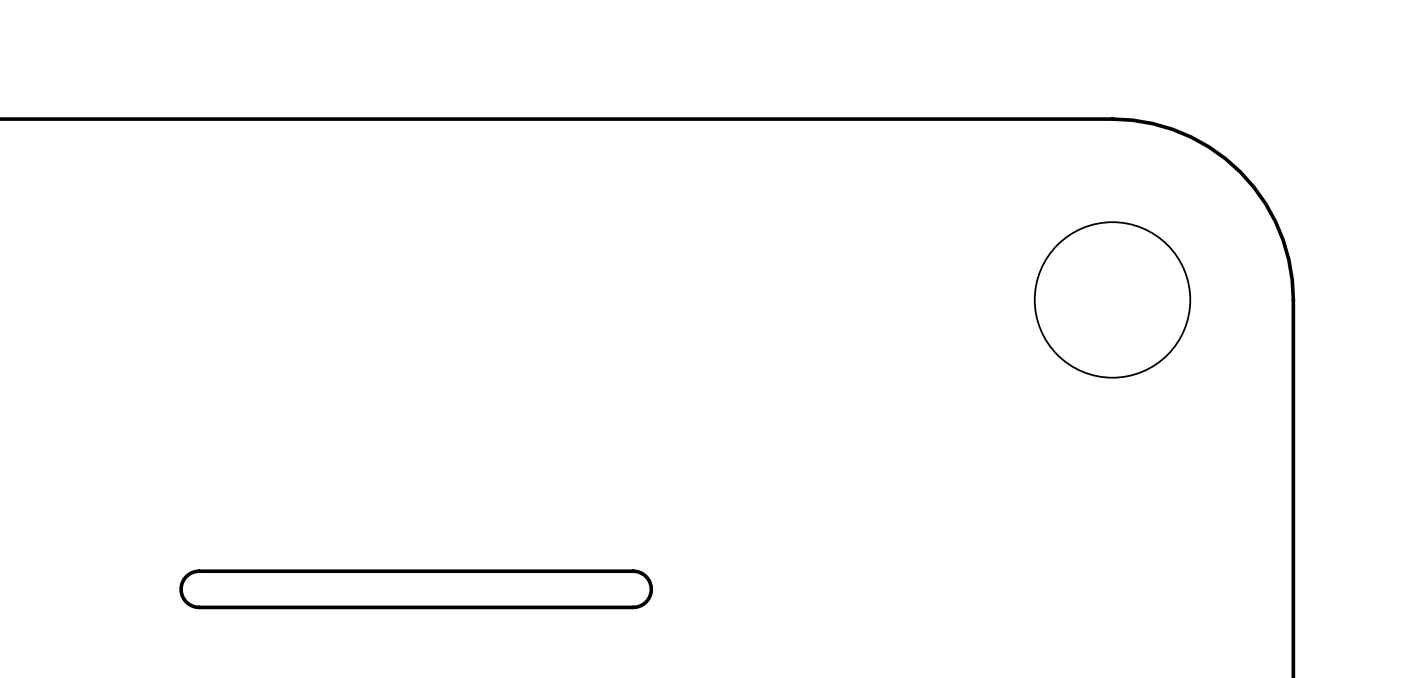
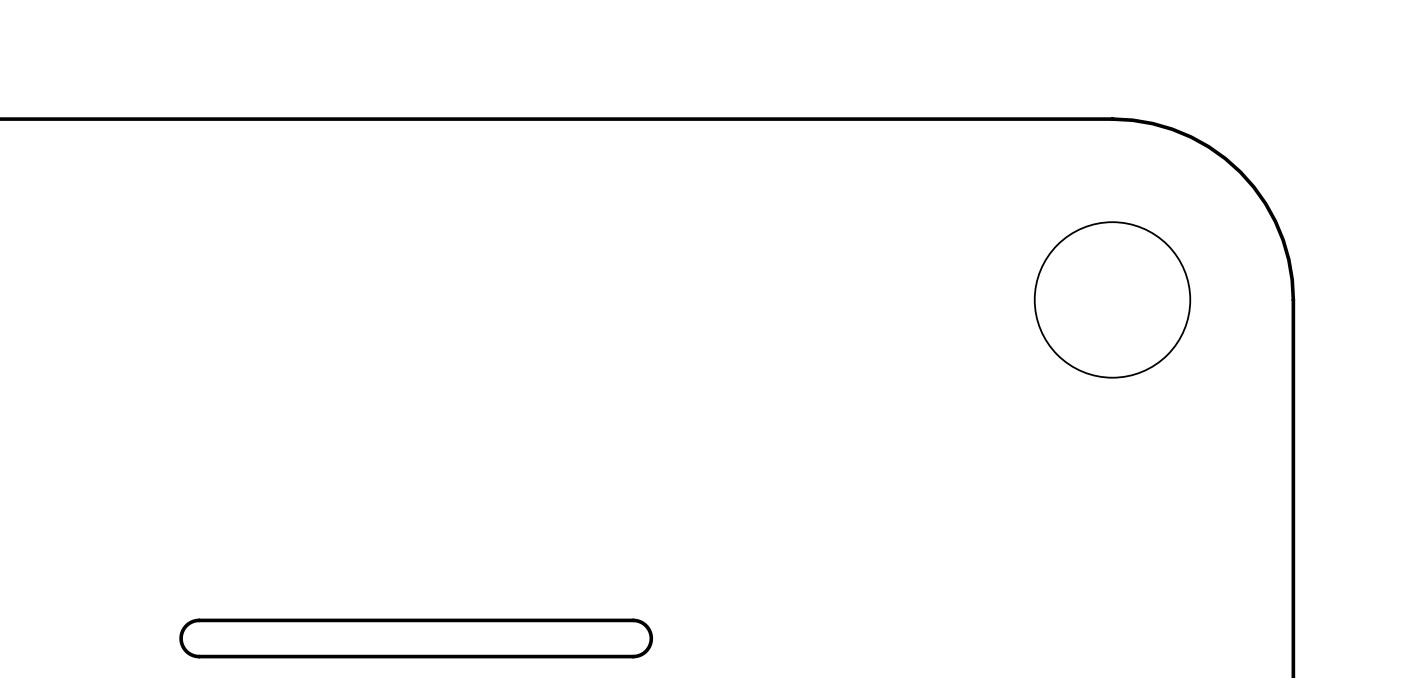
board edge: (633, 571) (199, 571) (186, 576) (181, 589) (186, 602) (199, 607) (633, 607) (646, 602) (651, 589) (646, 576) (633, 571) -> none
board edge: none -> (633, 620) (199, 620) (187, 624) (183, 630) (181, 638) (185, 650) (190, 654) (199, 656) (633, 656) (641, 654) (646, 650) (651, 638) (650, 632) (645, 624) (633, 620)

